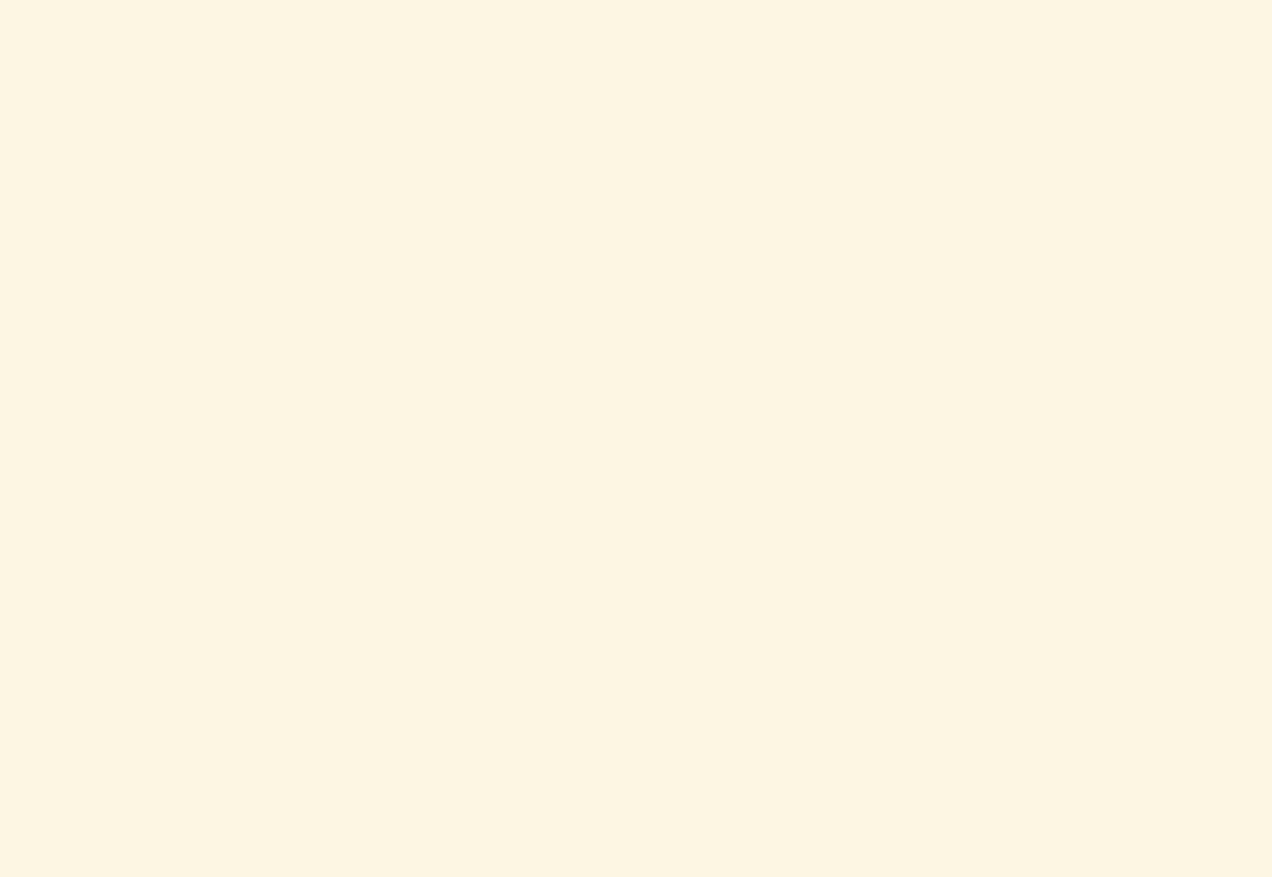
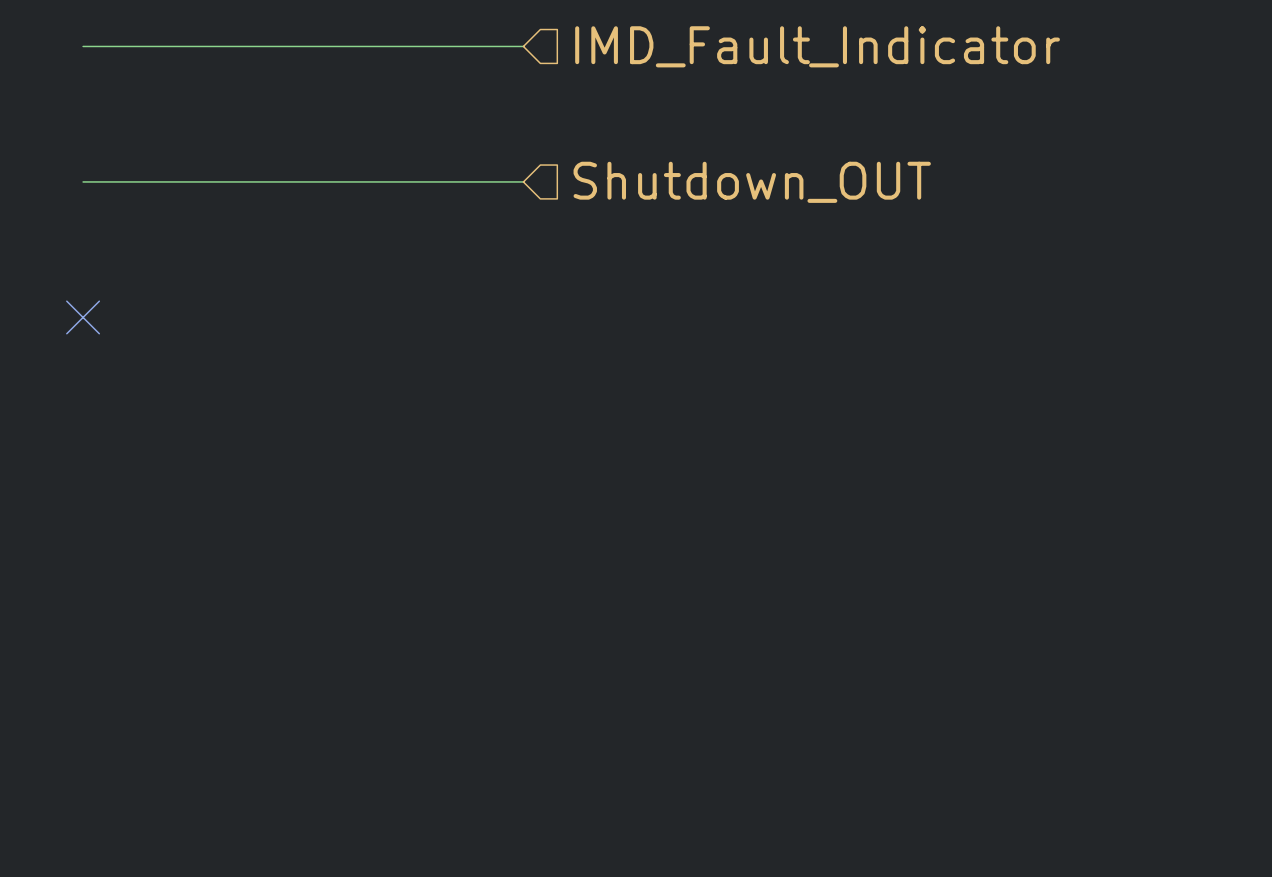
wire: none -> (83, 46) (523, 46)
hierarchical label: none -> IMD_Fault_Indicator (817, 46)
wire: none -> (83, 181) (523, 181)
hierarchical label: none -> Shutdown_OUT (752, 182)
no-connect mark: none -> (83, 317)

